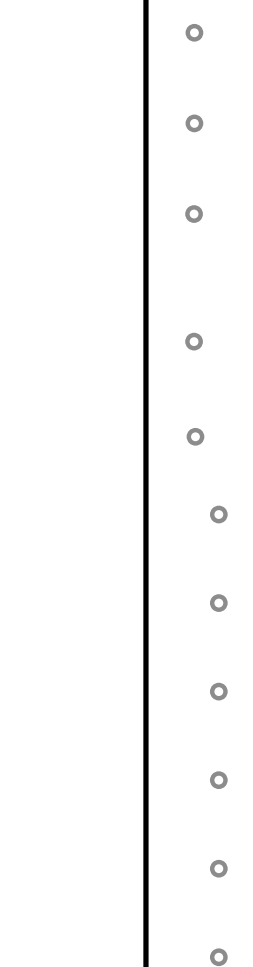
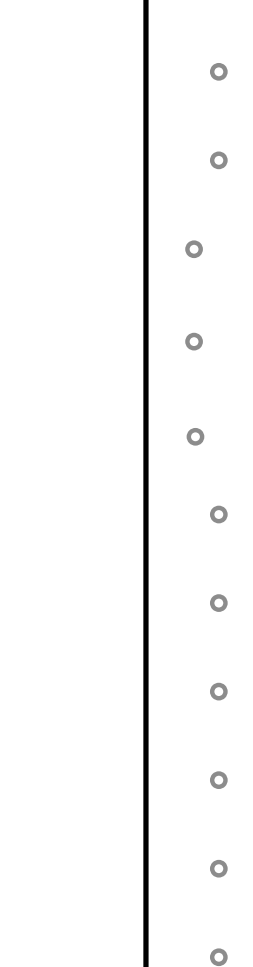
via: (194, 32) -> none
via: none -> (218, 71)
via: (194, 123) -> none
via: none -> (218, 160)
via: (194, 214) -> none
via: none -> (194, 249)

